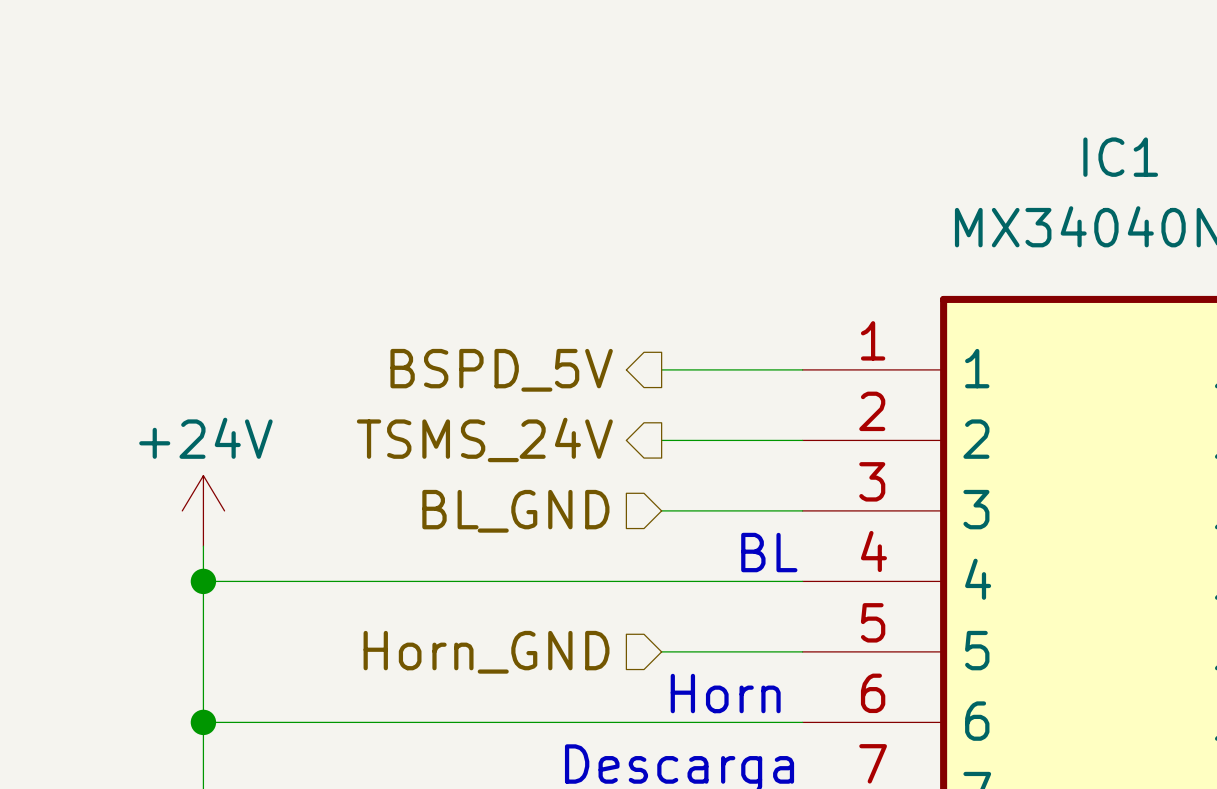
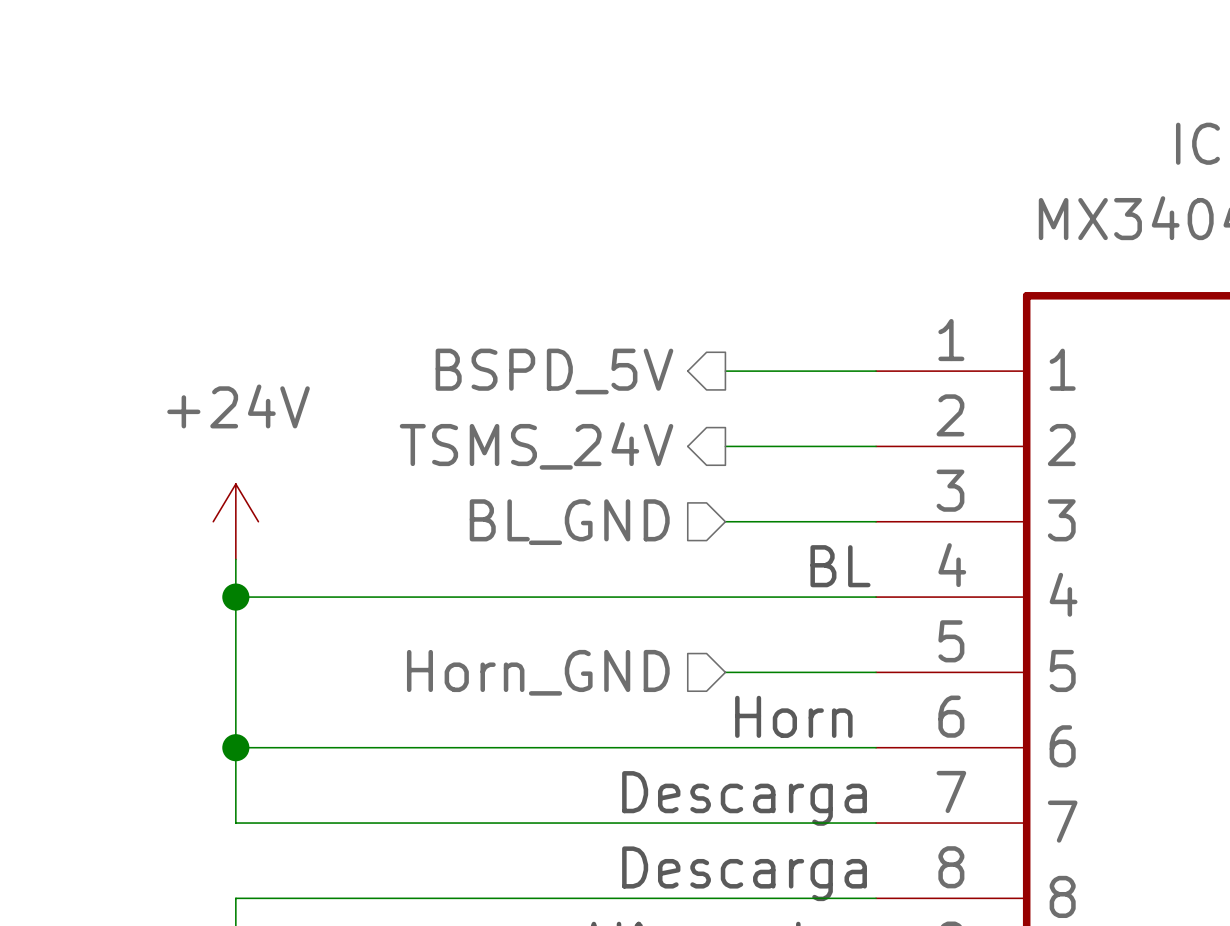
power symbol text position: +24V (205, 438) -> +24V (238, 406)

